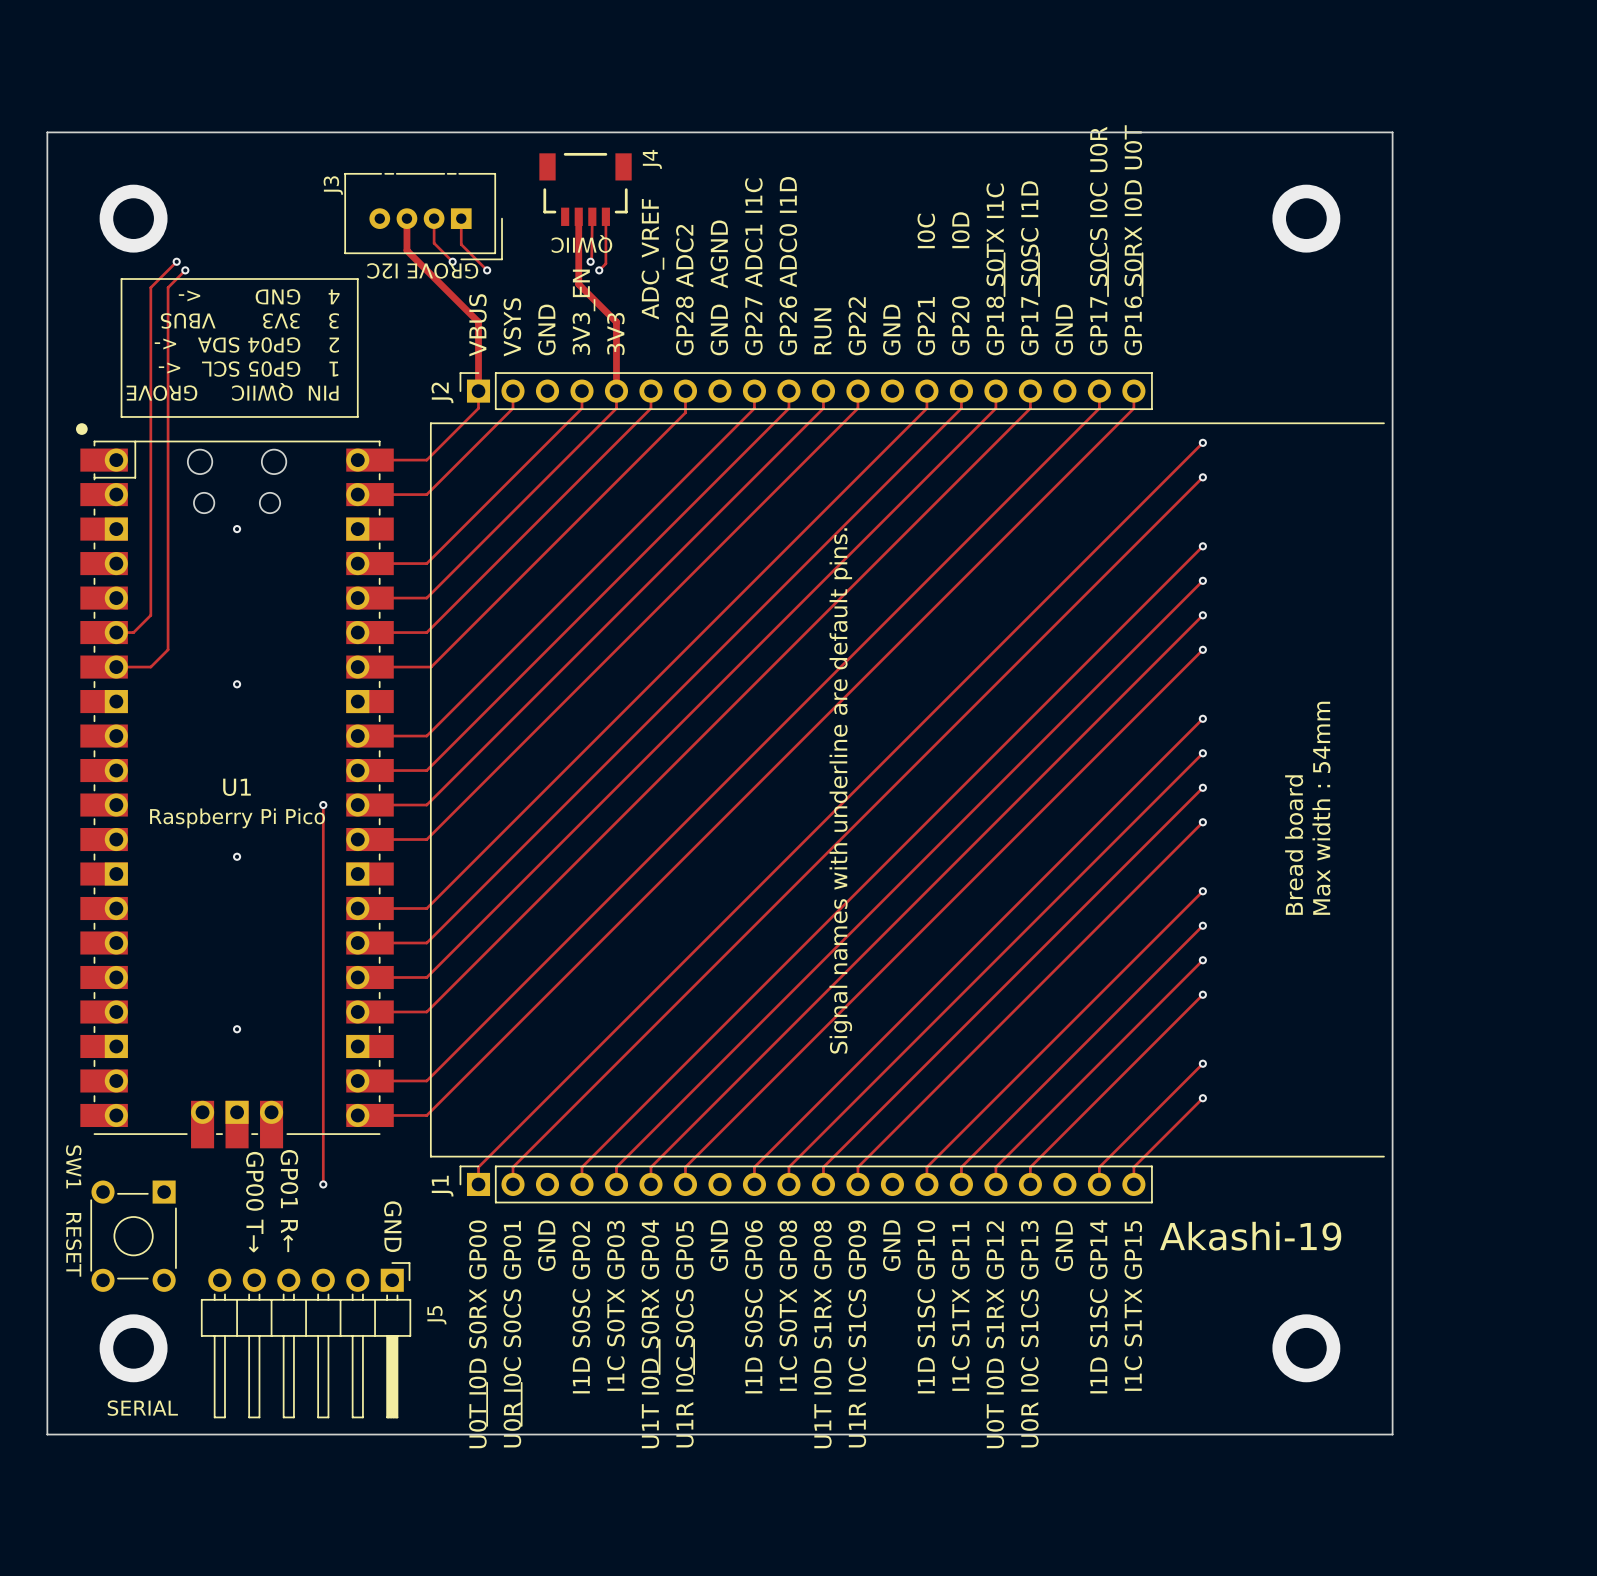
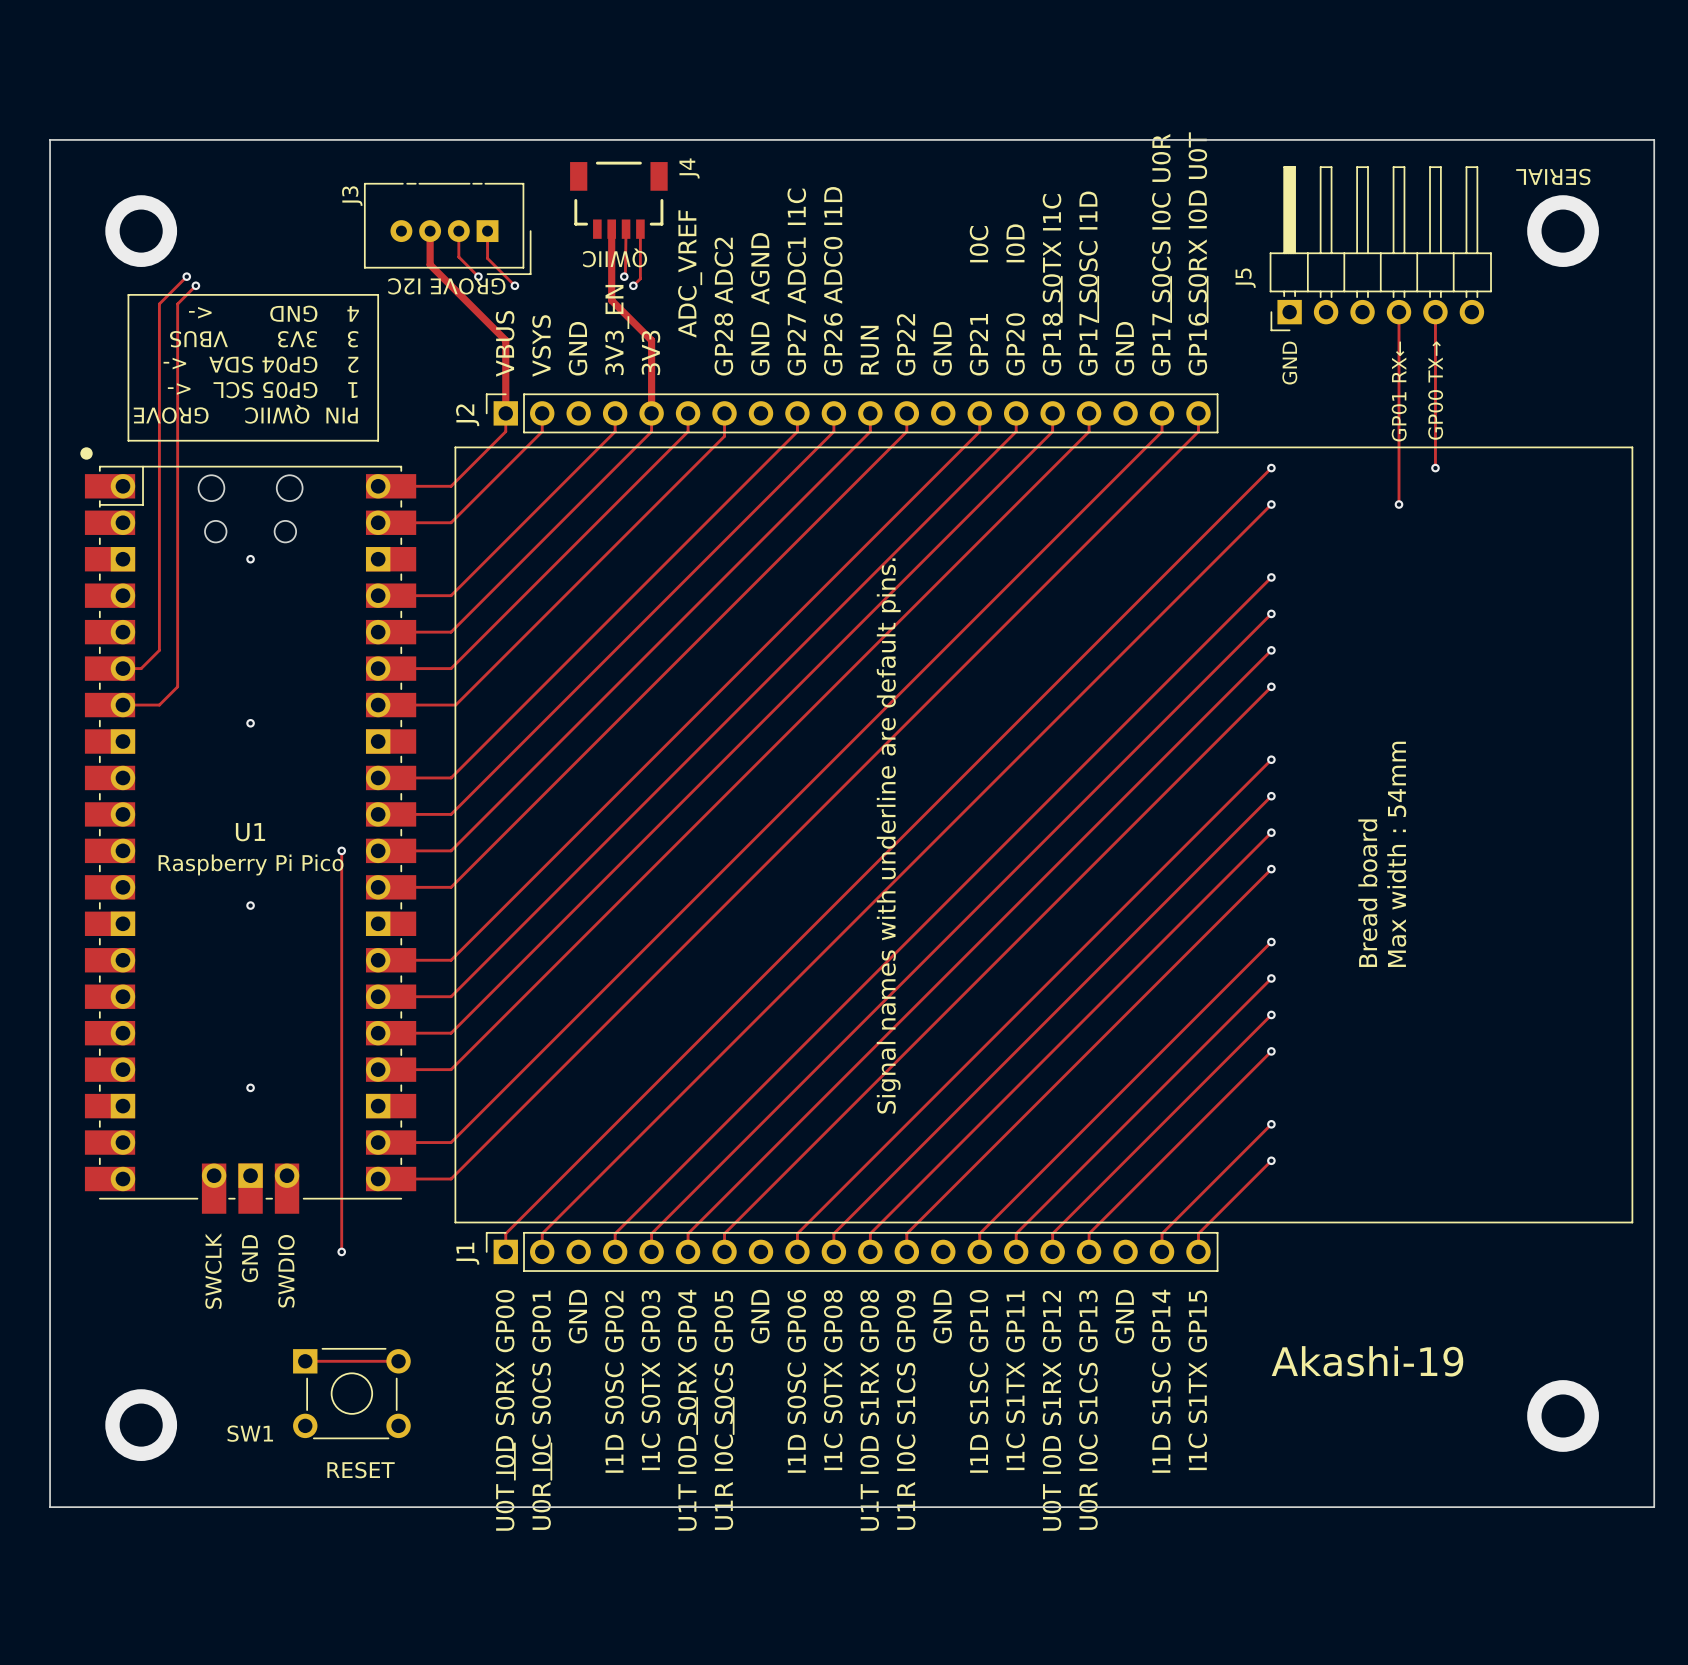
board edge: (1392, 132) (1392, 1434) (47, 1434) (47, 1425) -> (1471, 139) (1654, 139) (1654, 1507) (50, 1507)
via: (1306, 218) -> none
via: none -> (1563, 231)
line: (1004, 253) (1004, 261) -> (1061, 313) (1061, 322)
line: (1039, 253) (1039, 261) -> (1098, 313) (1098, 322)
line: (1108, 253) (1108, 261) -> (1171, 313) (1171, 322)
line: (1142, 253) (1142, 261) -> (1207, 313) (1207, 322)
track: none -> (1399, 312) (1399, 504)
track: none -> (1435, 312) (1435, 468)
text: none -> GND (1289, 363)
text: none -> GP00 TX→ (1435, 390)
text: none -> GP01 RX← (1399, 391)
line: none -> (1462, 447) (1632, 447) (1632, 1222) (1462, 1222)
via: none -> (1435, 468)
via: none -> (1399, 504)
SW1 name position: SW1 (73, 1166) -> SW1 (250, 1433)
U1 text: none -> GND (249, 1258)
text: GP01 R← (289, 1201) -> none
U1 text: none -> SWCLK (213, 1271)
text: GP00 T→ (254, 1202) -> none
U1 text: none -> SWDIO (286, 1271)
text: GND (392, 1226) -> none
SW1 rotation: 0° (133, 1236) -> 90° counterclockwise (351, 1393)
SW1 position: (133, 1236) -> (351, 1393)
text position: Akashi-19 (1250, 1236) -> Akashi-19 (1367, 1361)
track: none -> (305, 1361) (398, 1361)
via: none -> (1563, 1415)
J5 rotation: 0° (306, 1340) -> 180° (1380, 248)
J5 position: (306, 1340) -> (1380, 248)
via: (1306, 1348) -> none
line: (659, 1356) (659, 1374) -> (697, 1397) (697, 1415)
line: (694, 1356) (694, 1374) -> (733, 1397) (733, 1415)
line: none -> (514, 1443) (514, 1461)
line: none -> (551, 1443) (551, 1461)
line: (487, 1400) (487, 1425) -> none
line: (521, 1400) (521, 1425) -> none

